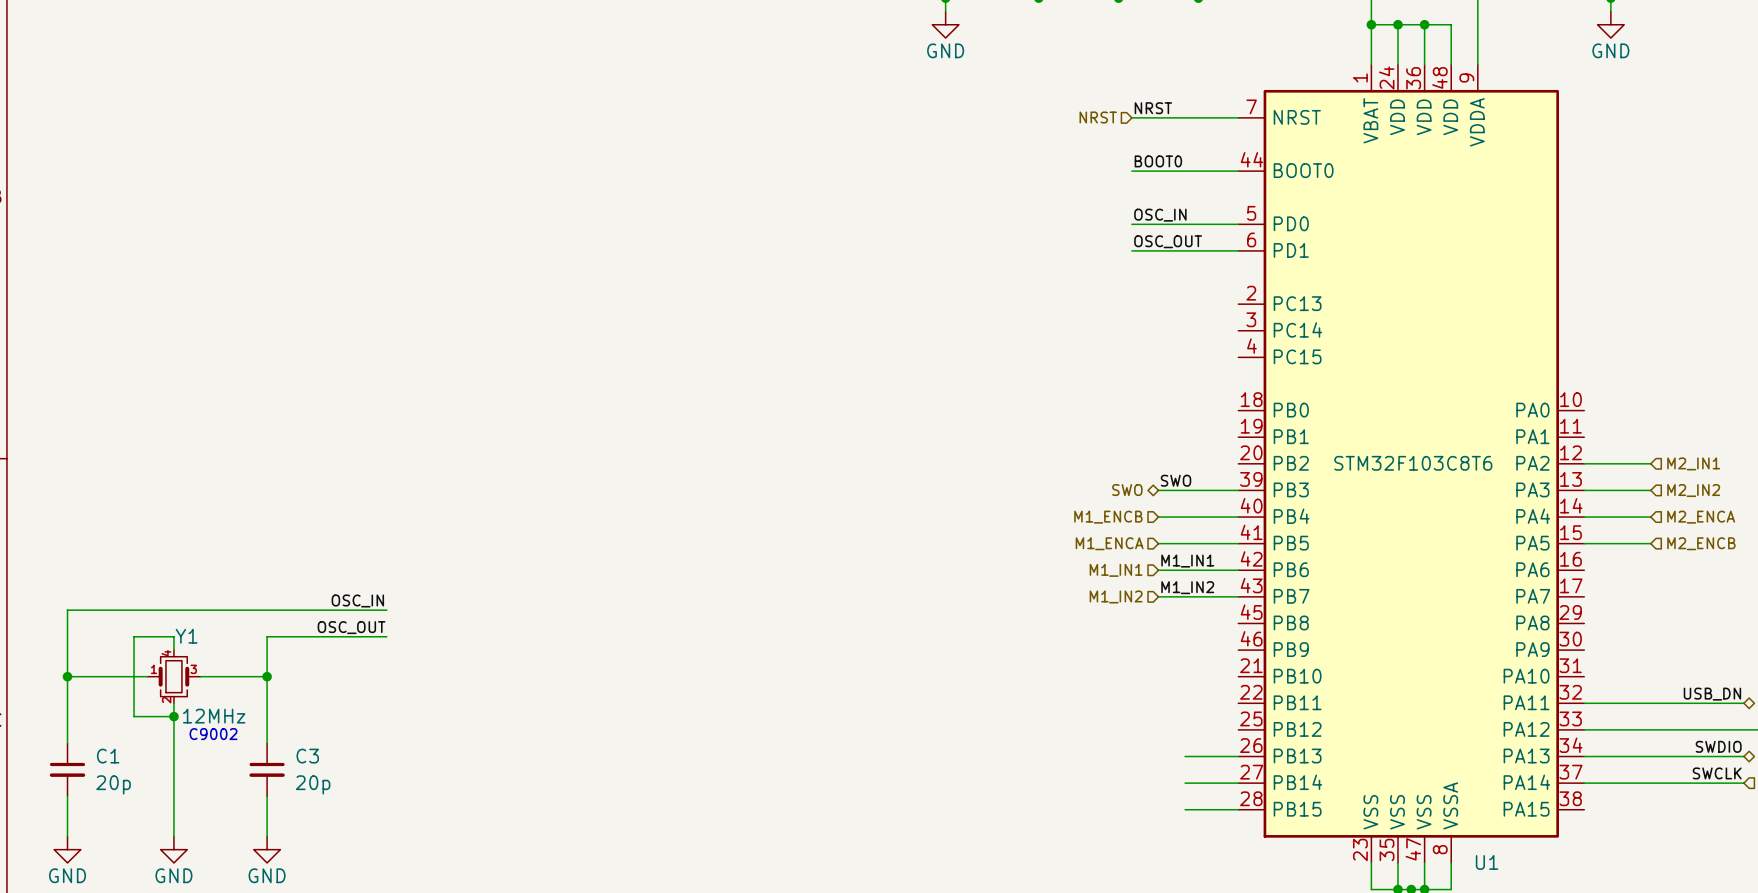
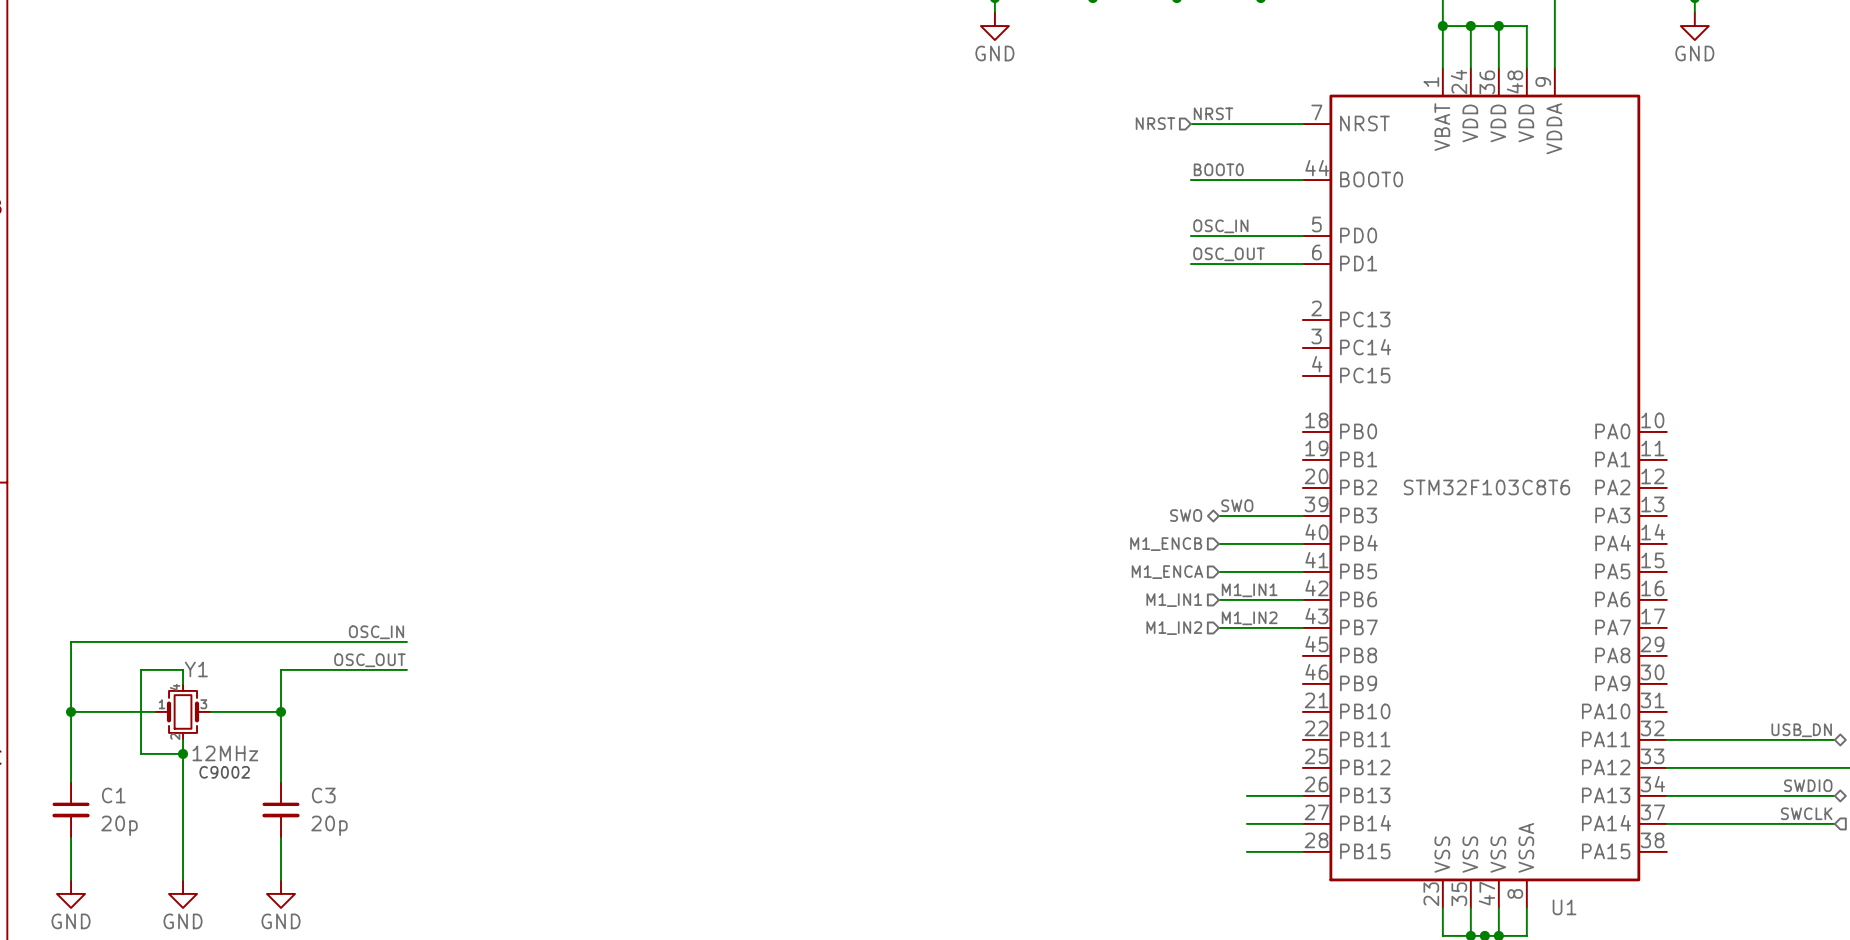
wire: (1584, 463) (1650, 463) -> none
hierarchical label: M2_IN1 (1693, 463) -> none
wire: (1584, 490) (1650, 490) -> none
hierarchical label: M2_IN2 (1693, 490) -> none
wire: (1584, 517) (1650, 517) -> none
hierarchical label: M2_ENCA (1701, 517) -> none
wire: (1584, 543) (1650, 543) -> none
hierarchical label: M2_ENCB (1701, 543) -> none

